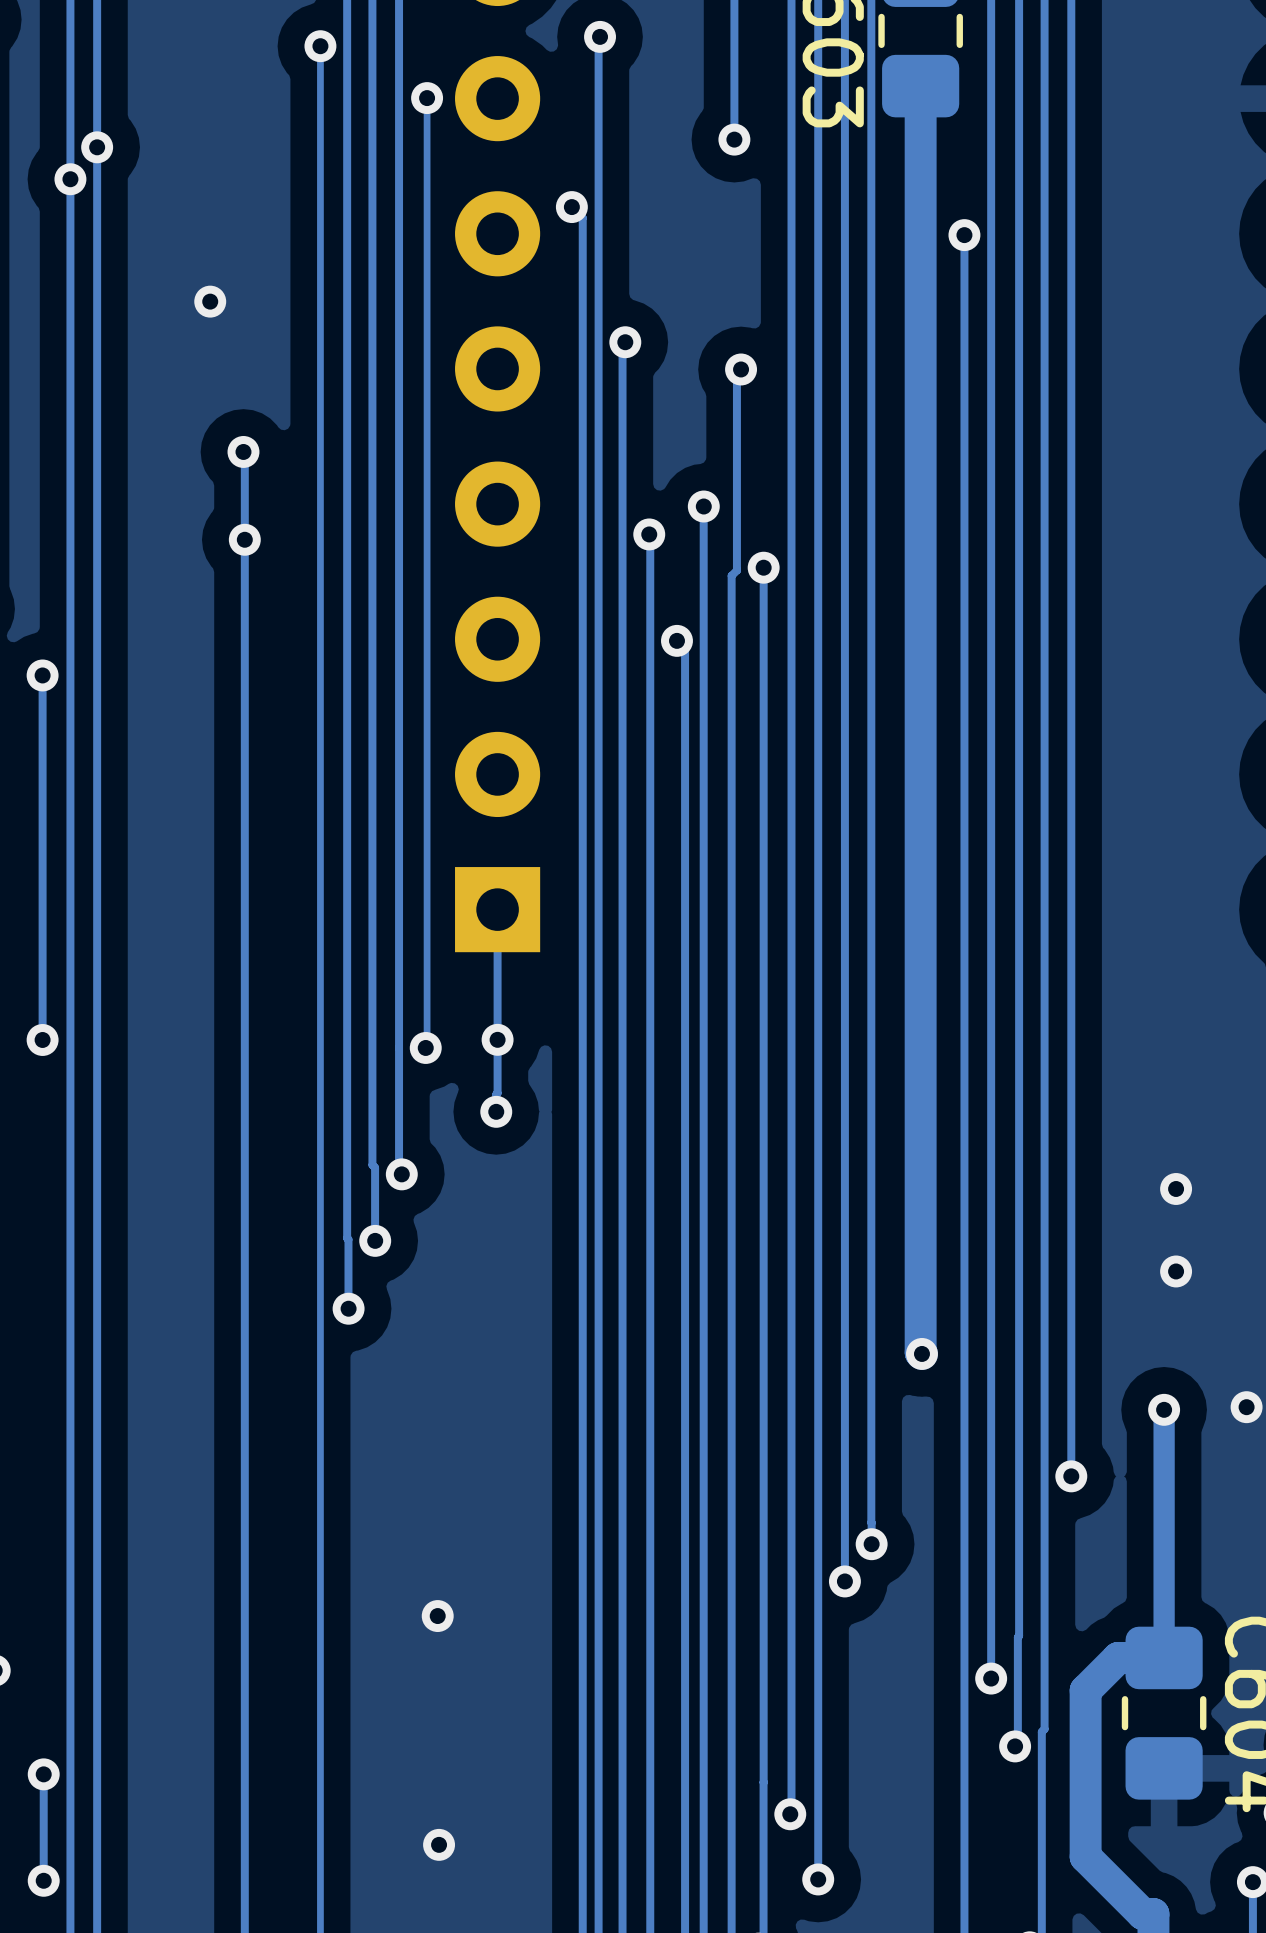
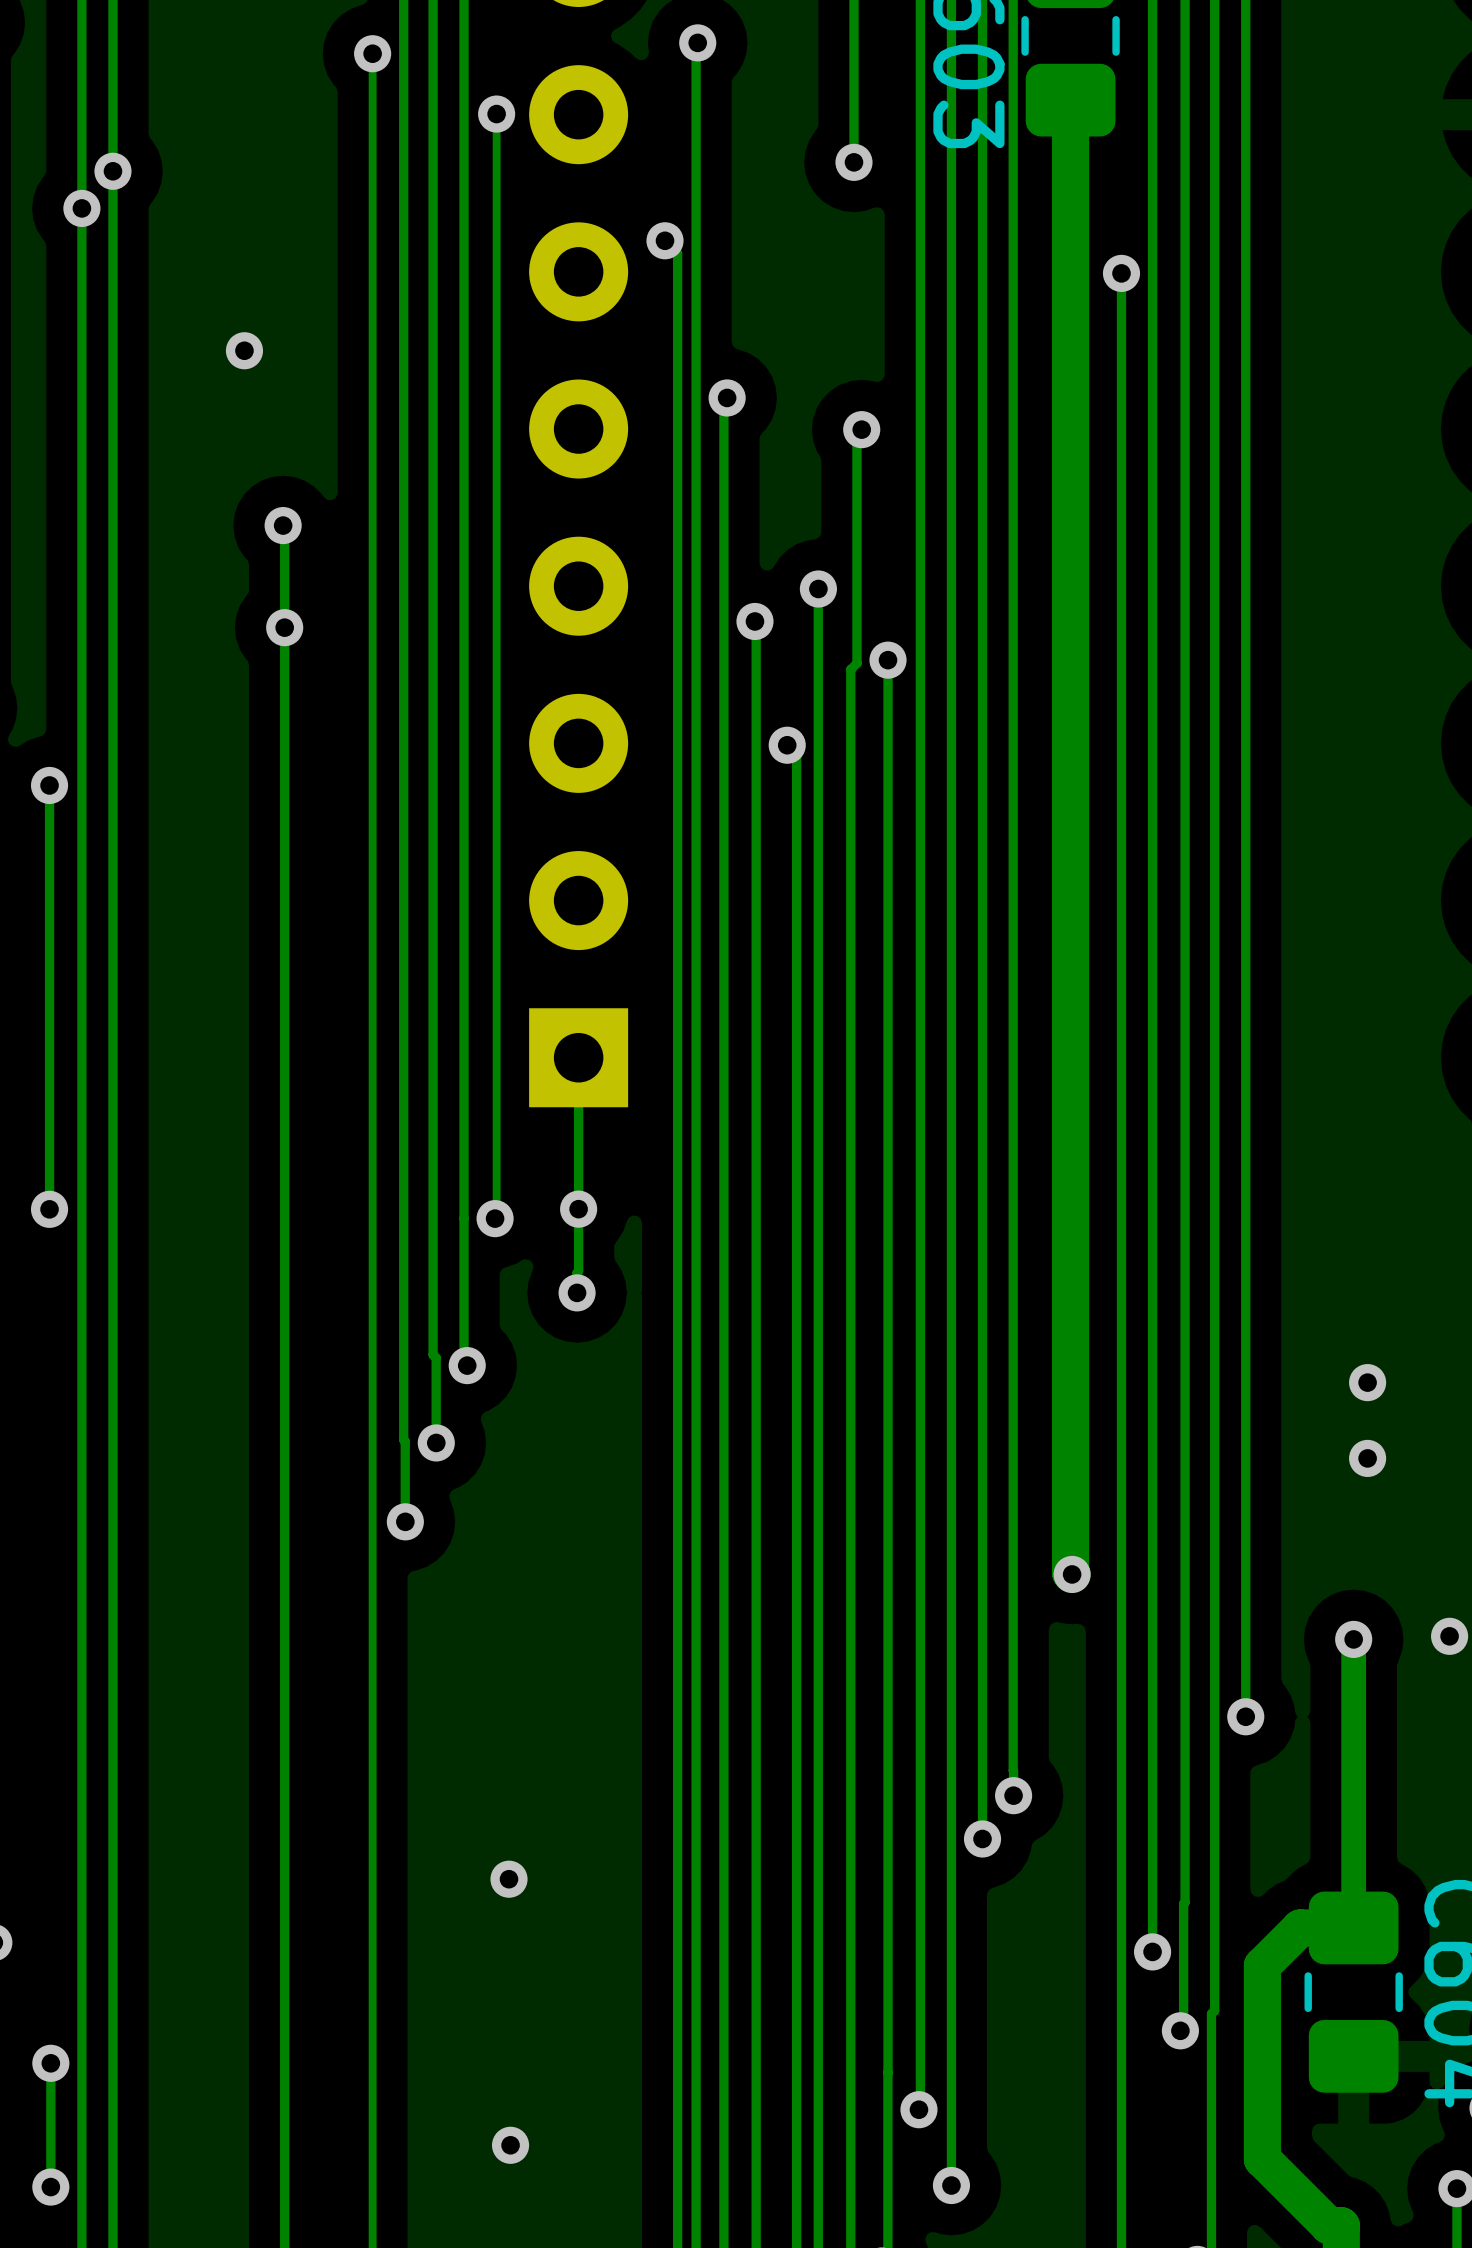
via position: (1176, 1271) -> (1367, 1458)

